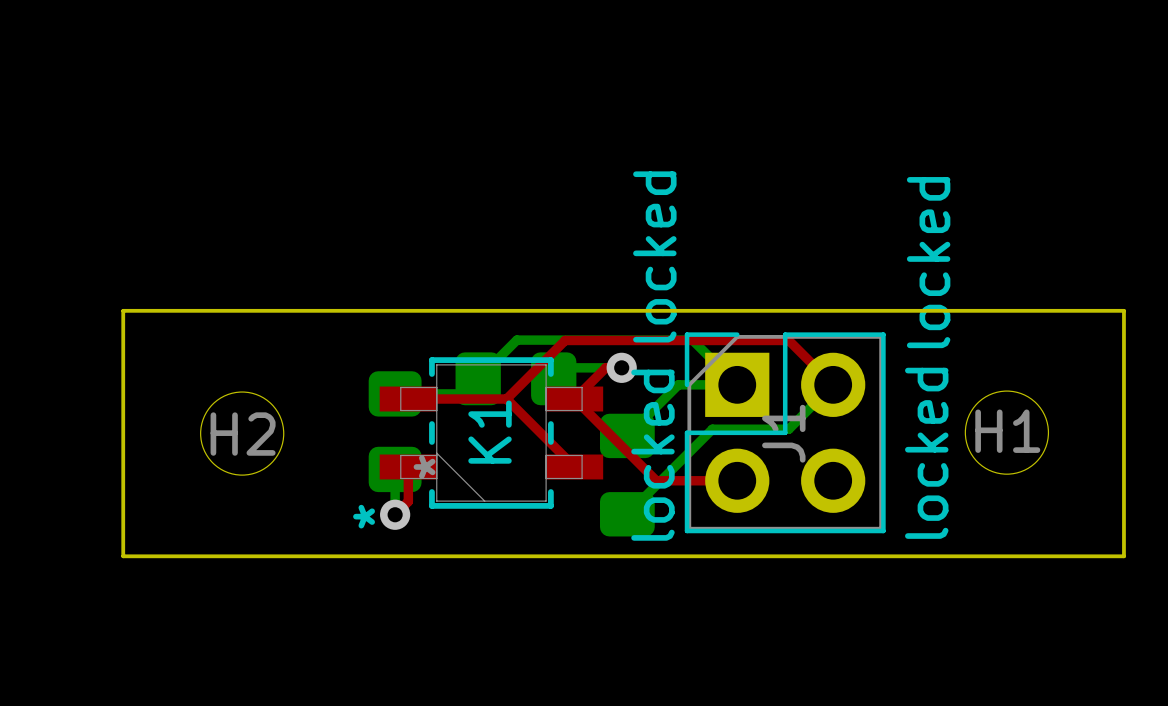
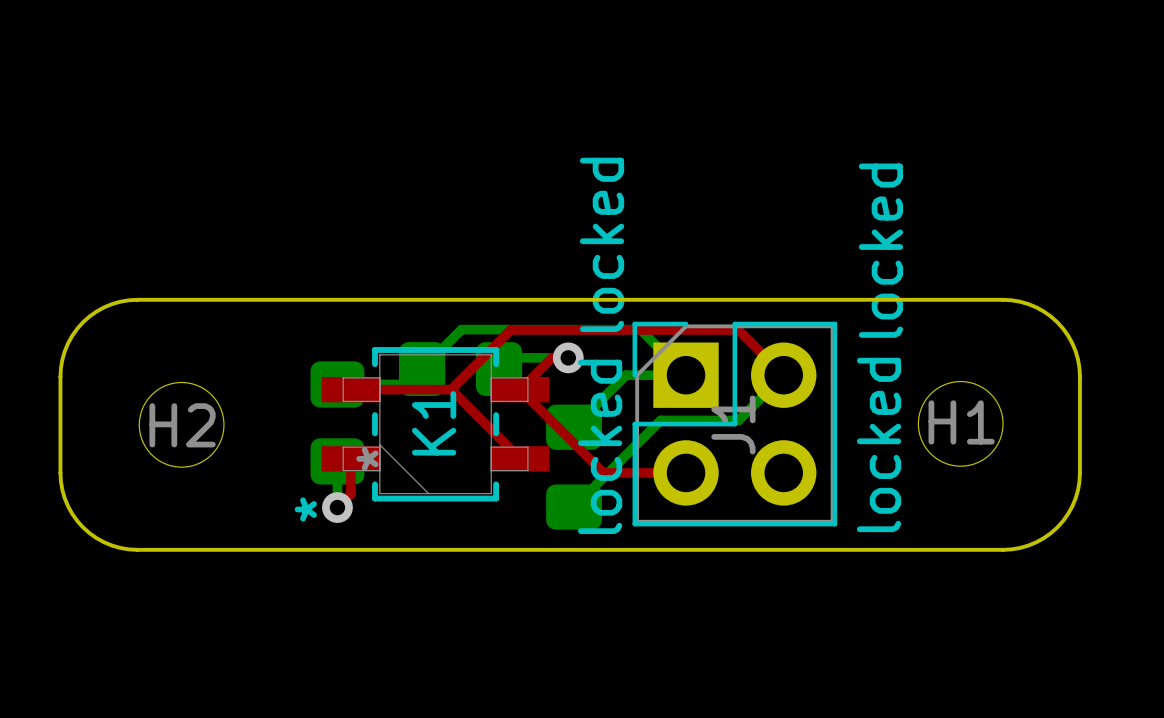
board edge: (198, 310) (123, 310) (123, 386) -> (137, 299) (111, 304) (96, 311) (82, 322) (72, 335) (64, 351) (60, 376)
board edge: (1048, 310) (1123, 310) (1123, 386) -> (1003, 299) (1028, 304) (1043, 311) (1057, 322) (1068, 335) (1075, 351) (1079, 376)
board edge: (123, 480) (123, 556) (198, 556) -> (60, 472) (64, 498) (72, 513) (82, 527) (96, 538) (111, 545) (137, 549)
board edge: (1123, 480) (1123, 556) (1048, 556) -> (1079, 472) (1075, 498) (1068, 513) (1057, 527) (1043, 538) (1028, 545) (1003, 549)

